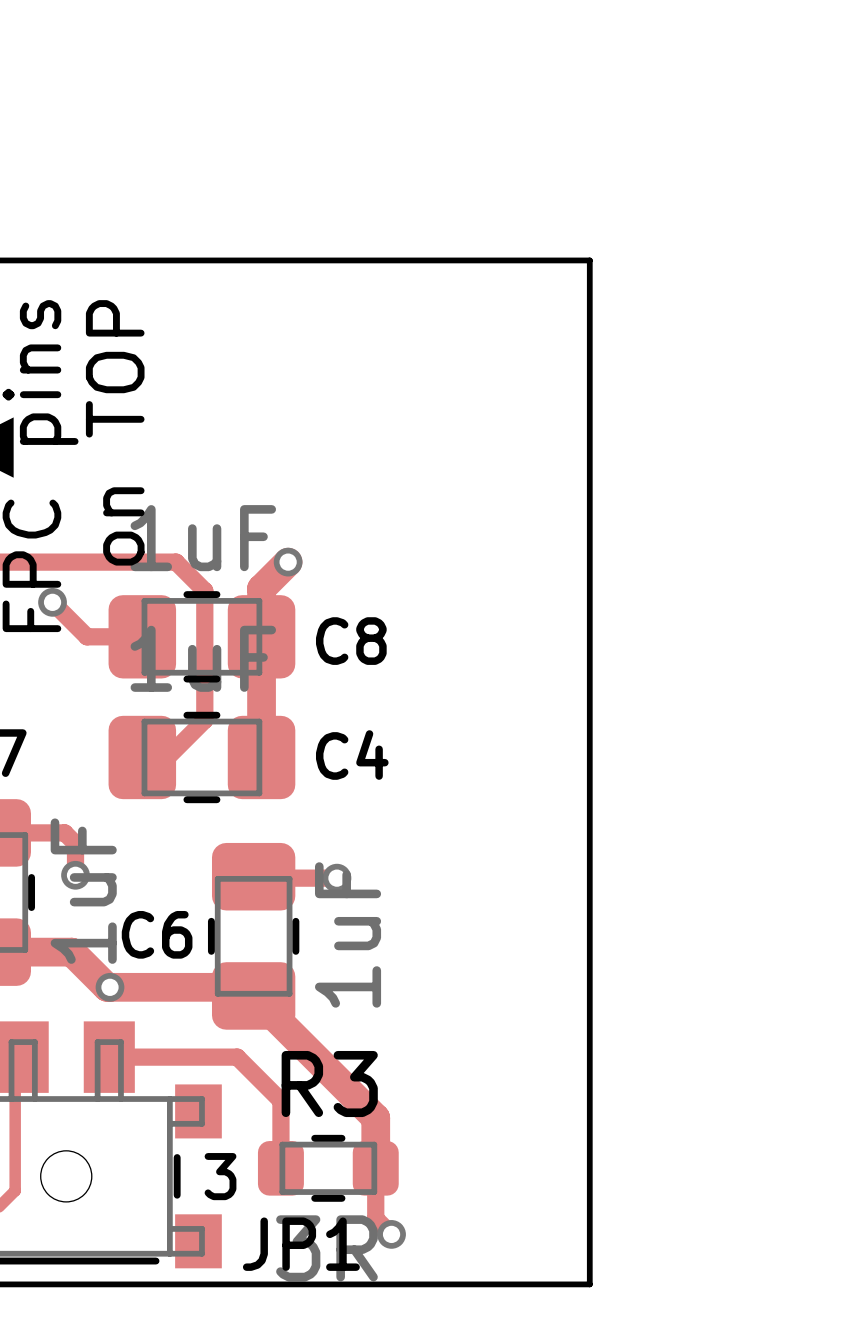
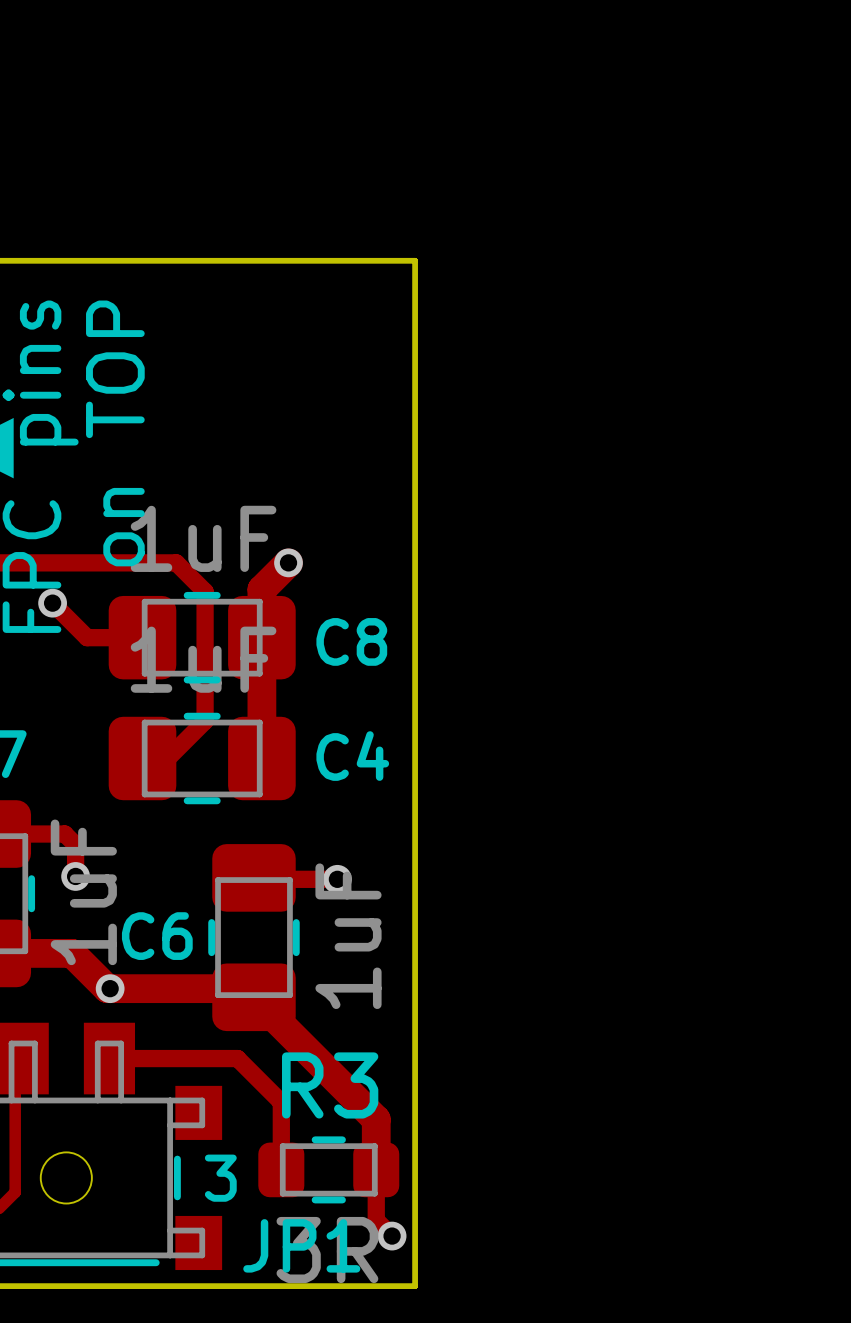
board edge: (414, 260) (589, 260) (589, 1284) (414, 1284) -> (415, 260) (415, 1286)

